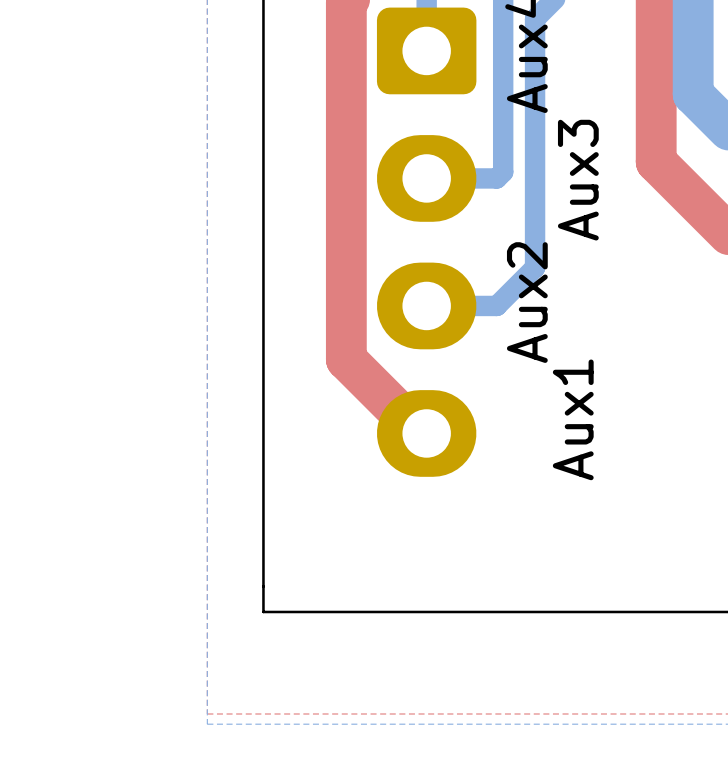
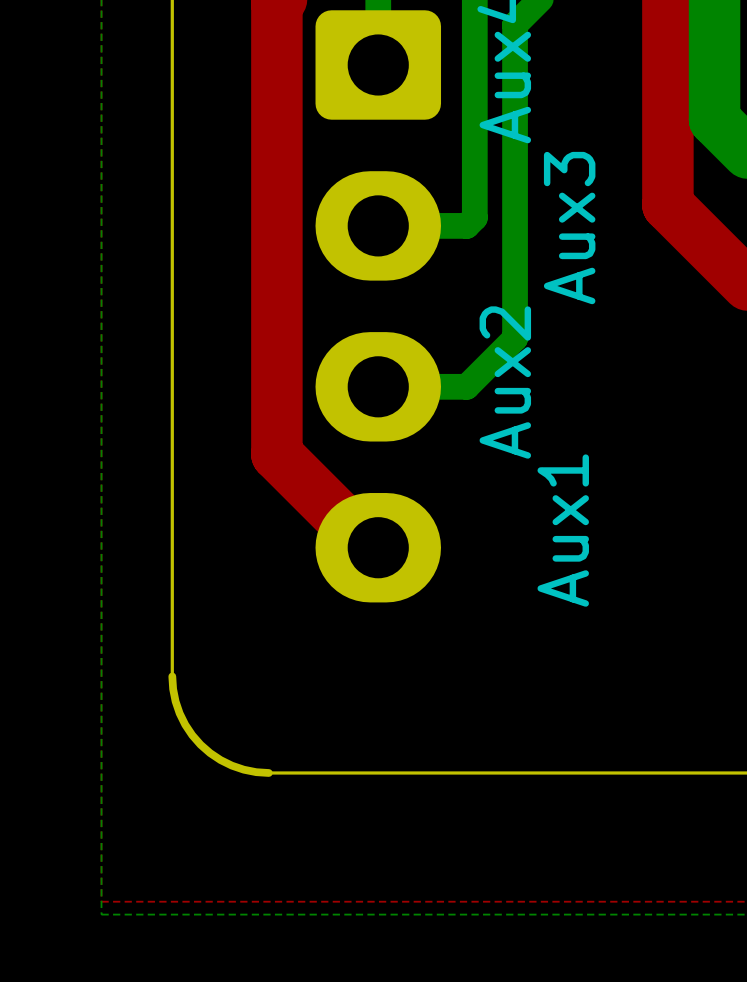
board edge: (263, 535) (263, 611) (339, 611) -> (172, 676) (173, 689) (179, 713) (192, 735) (200, 744) (210, 753) (231, 765) (256, 772) (268, 772)

